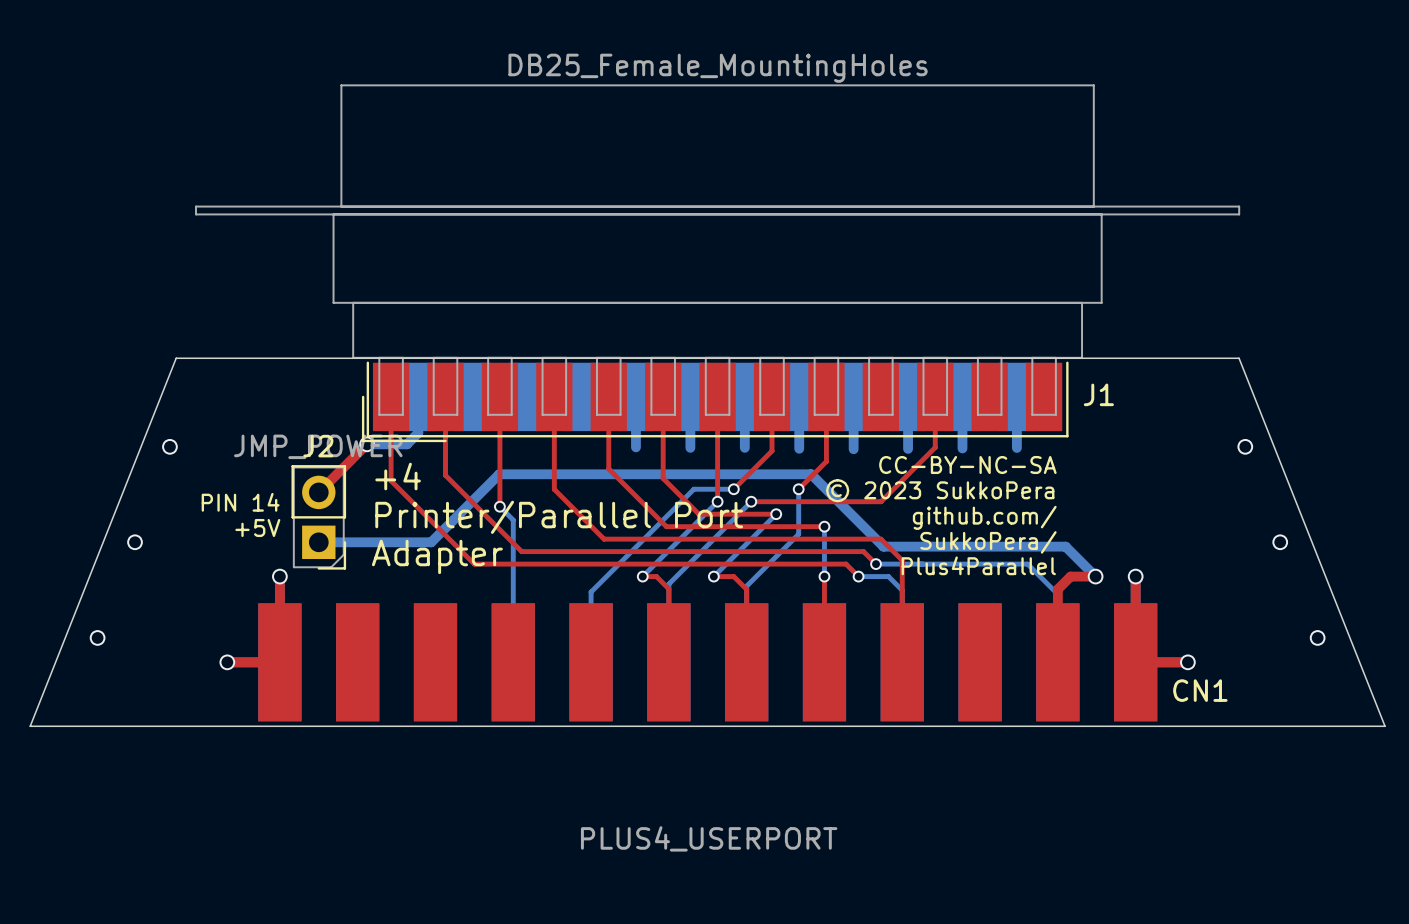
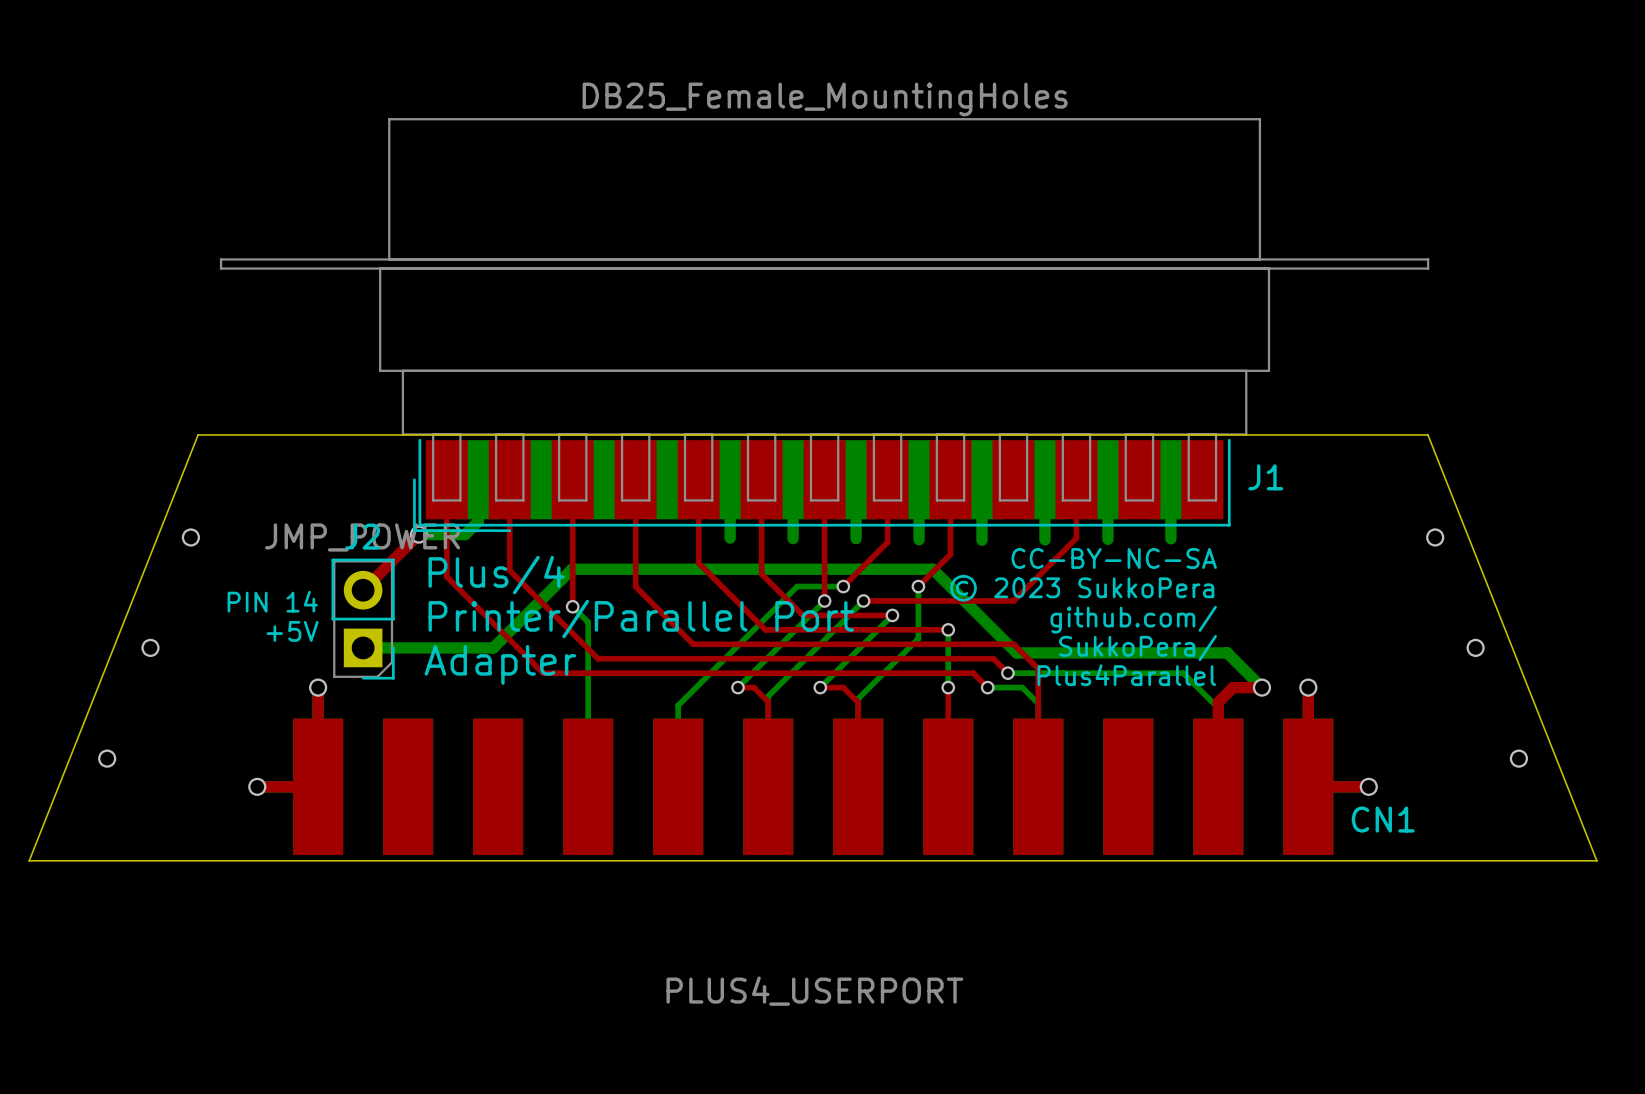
text: +4 (398, 476) -> Plus/4 (496, 575)

